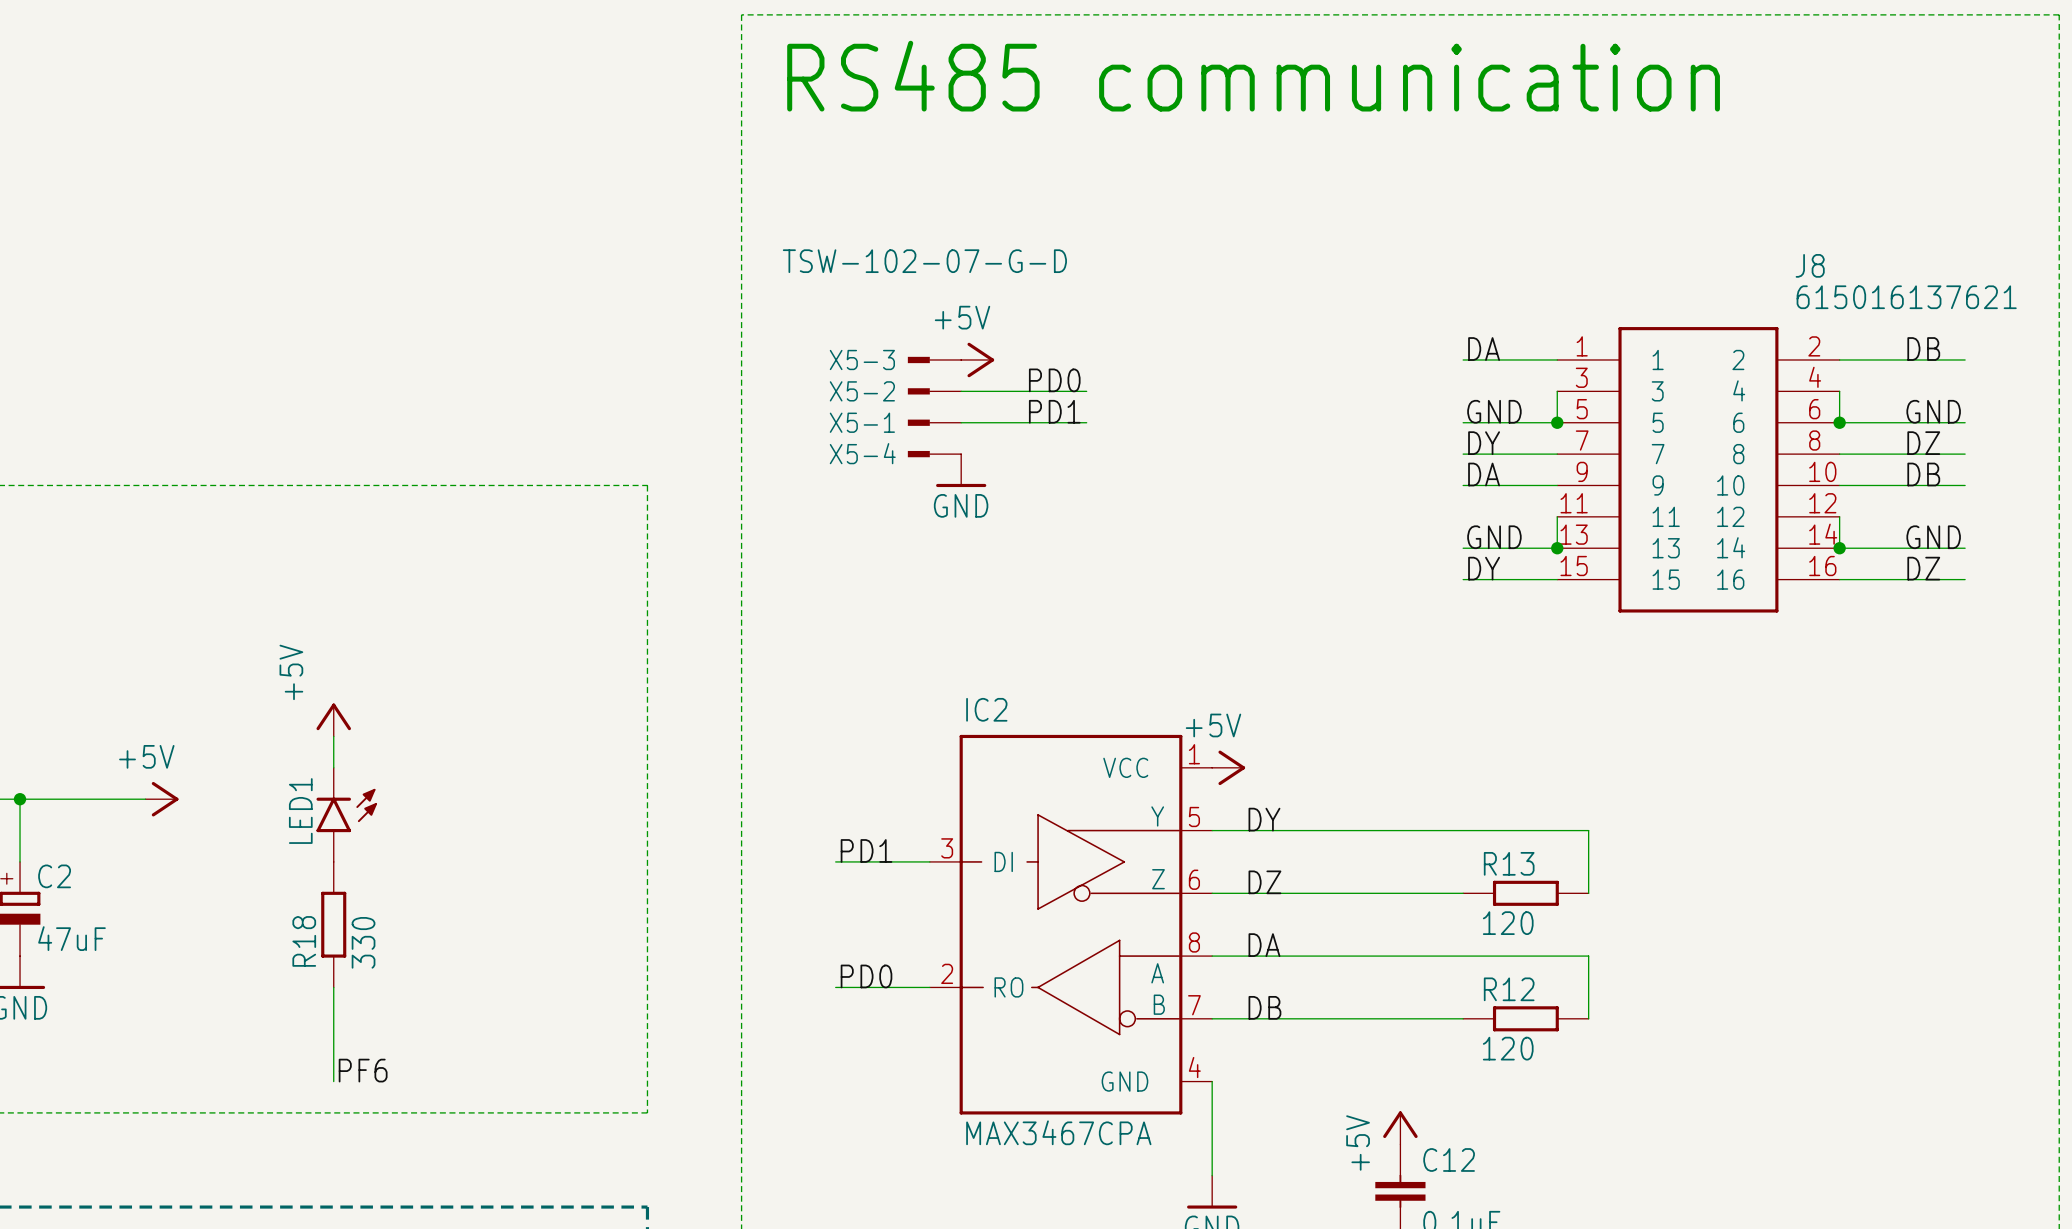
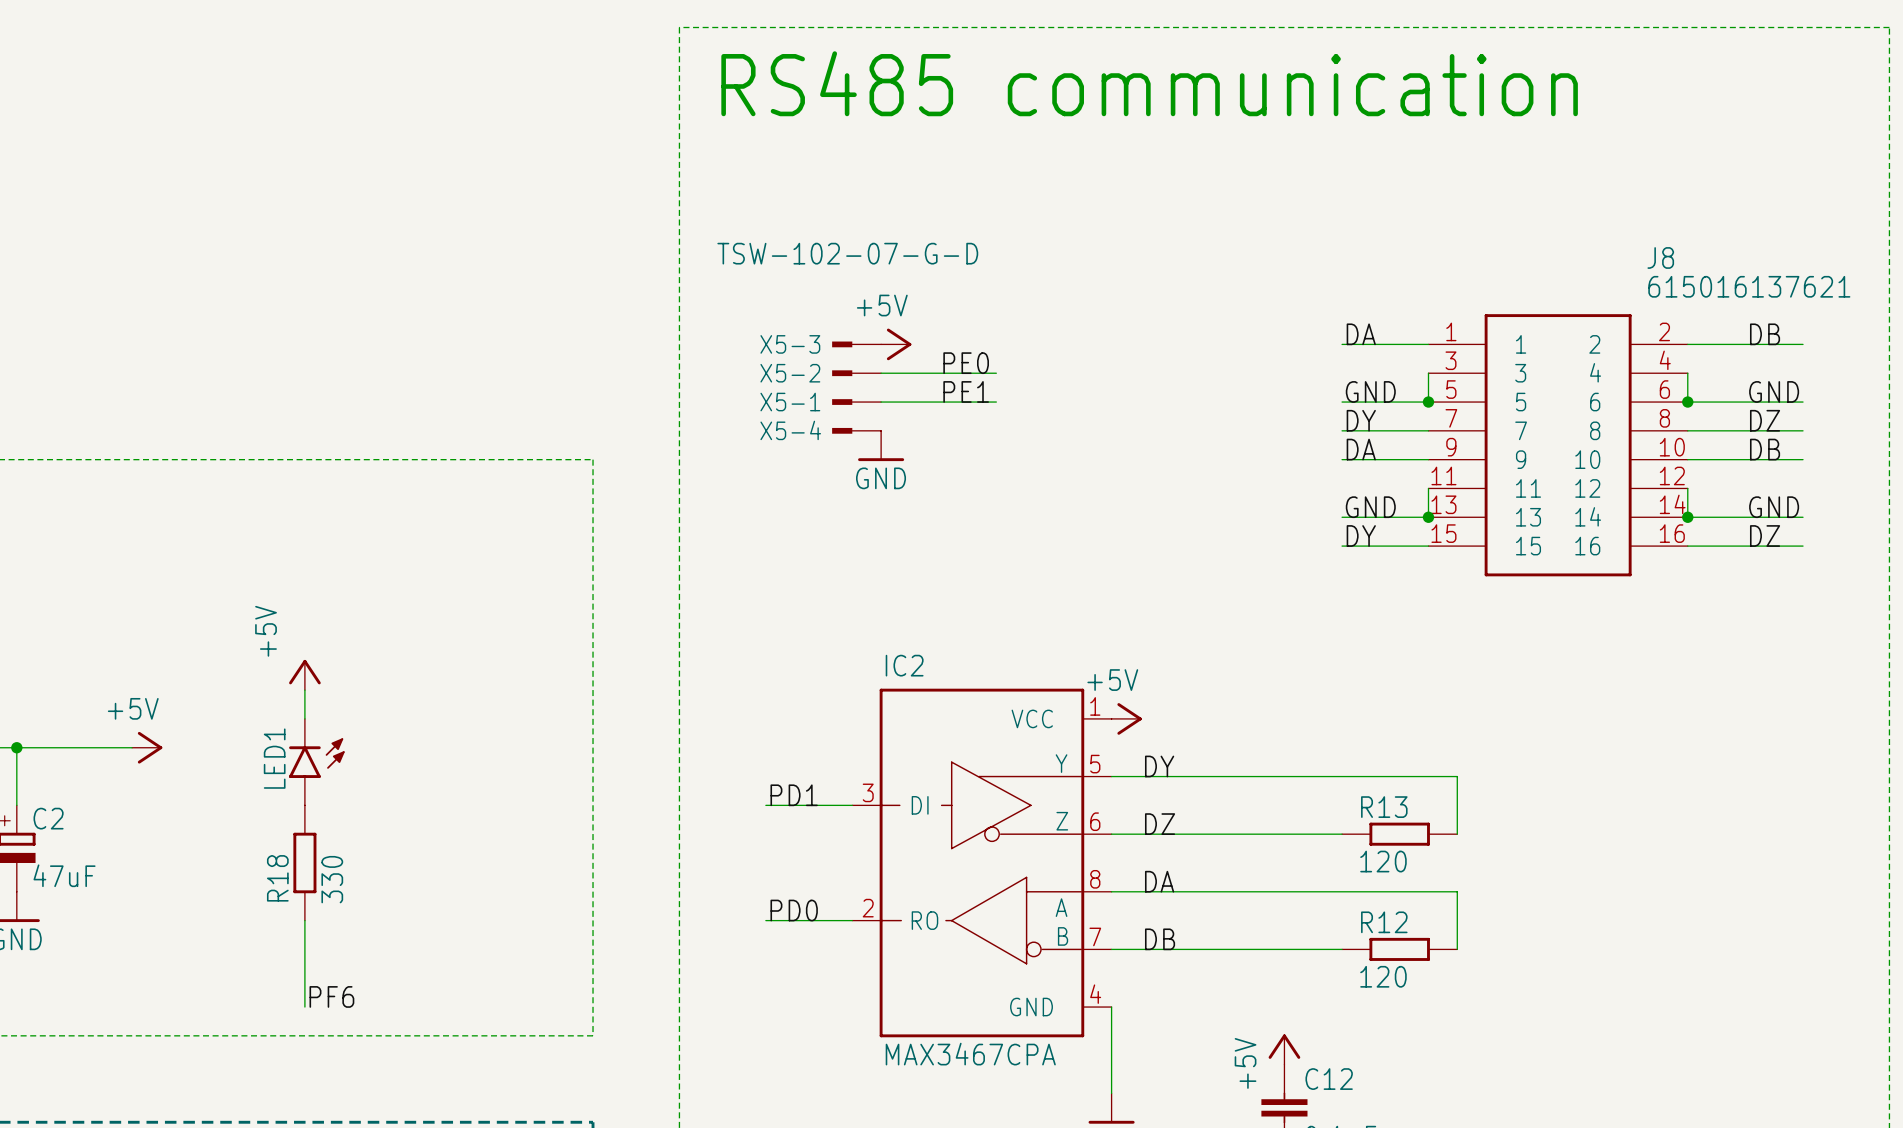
label: PD0 (1054, 380) -> PE0 (966, 363)
label: PD1 (1054, 411) -> PE1 (966, 391)

